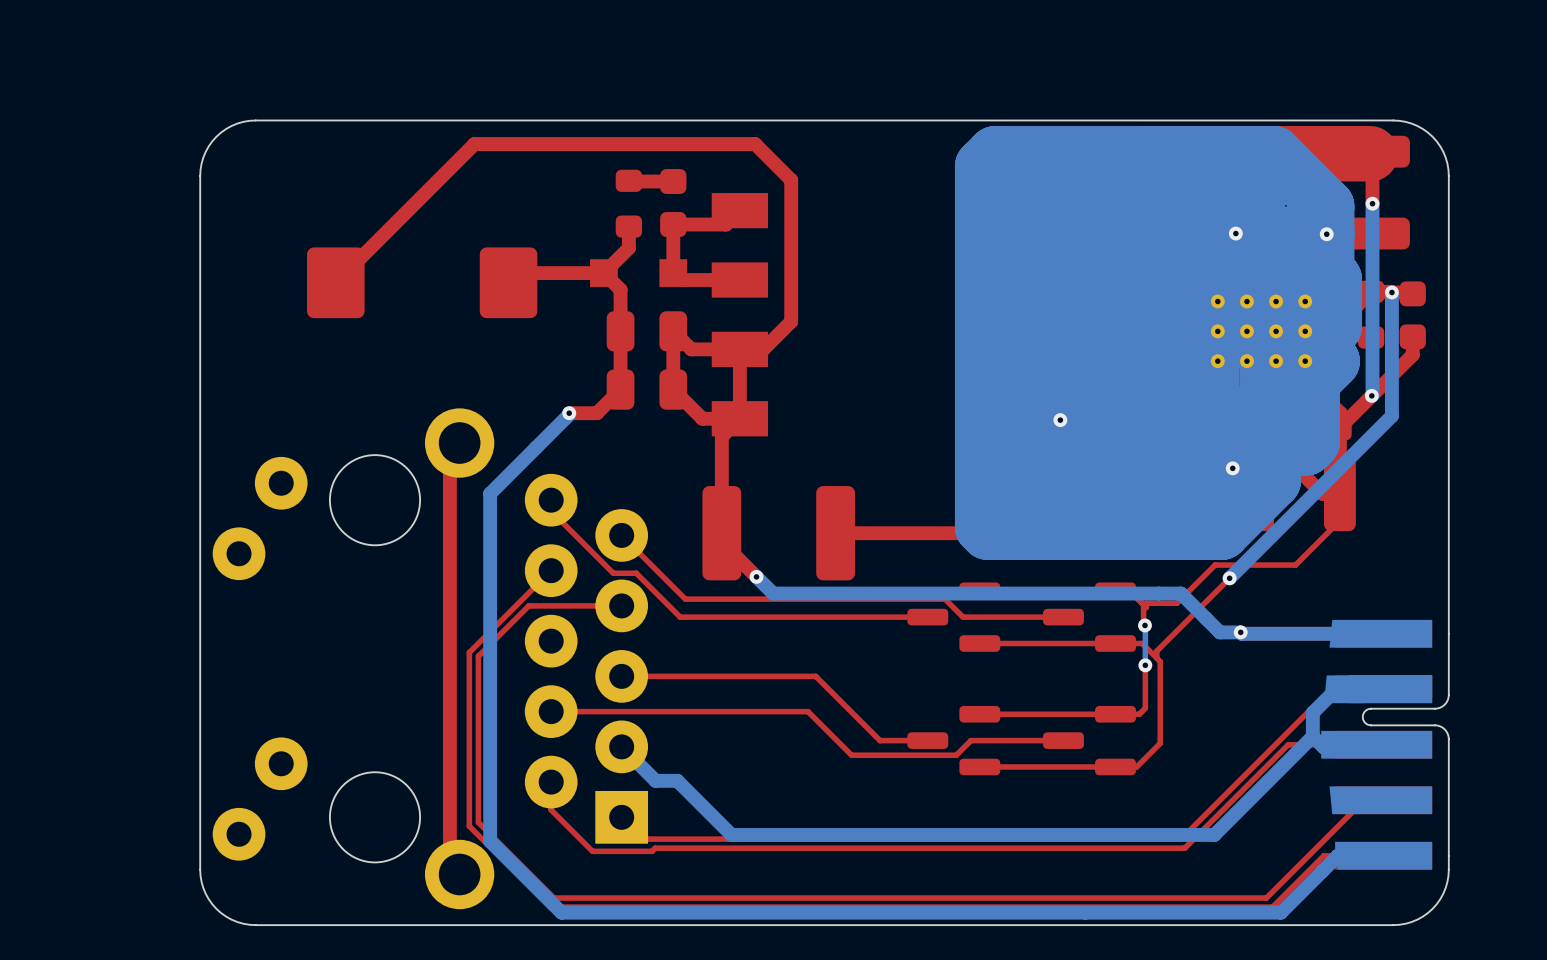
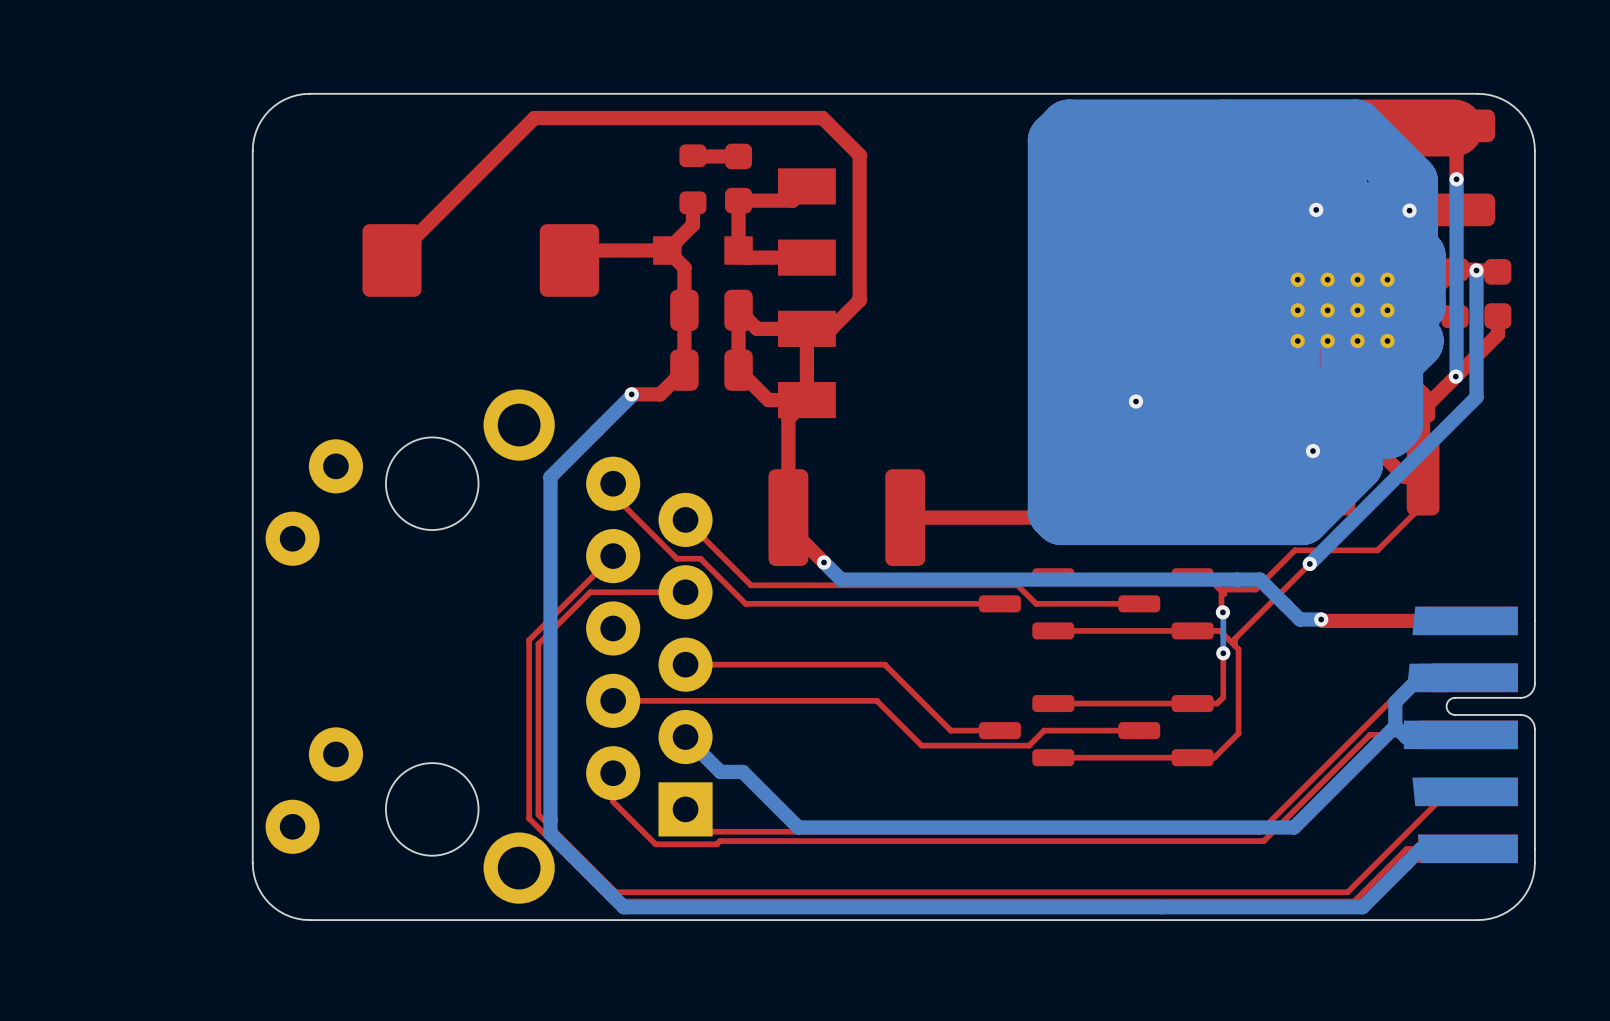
top track: (459, 443) (449, 452) (449, 864) (459, 874) -> none
bottom track: (1240, 632) (1382, 633) -> none

